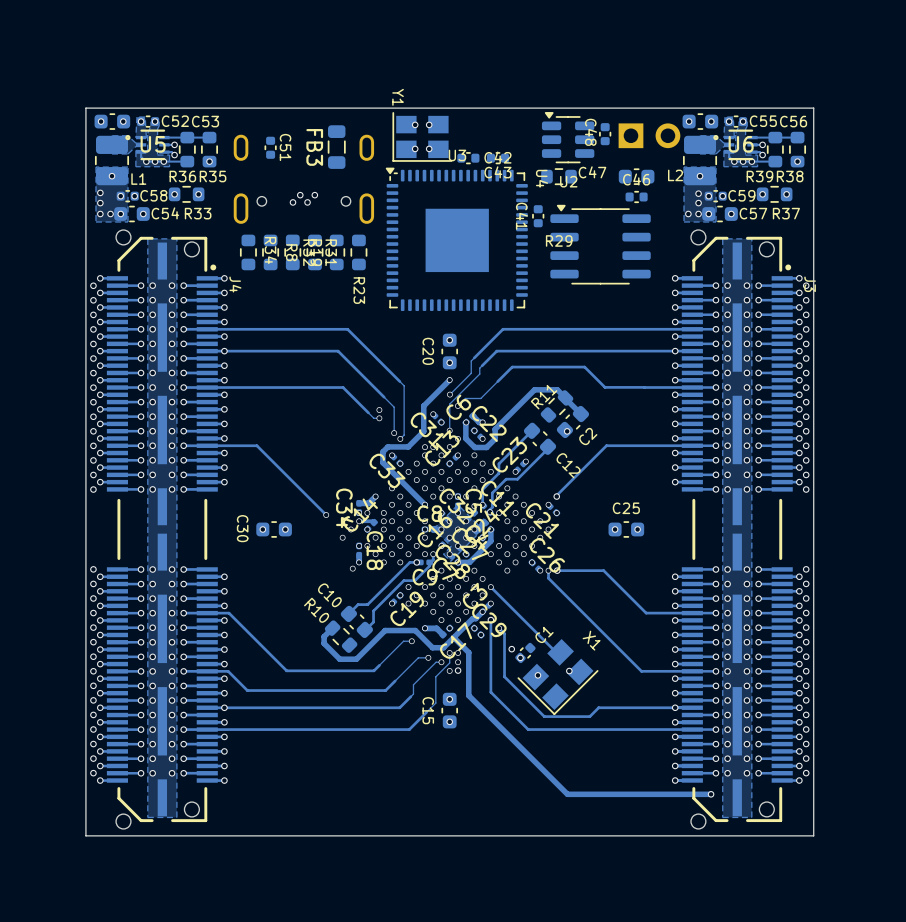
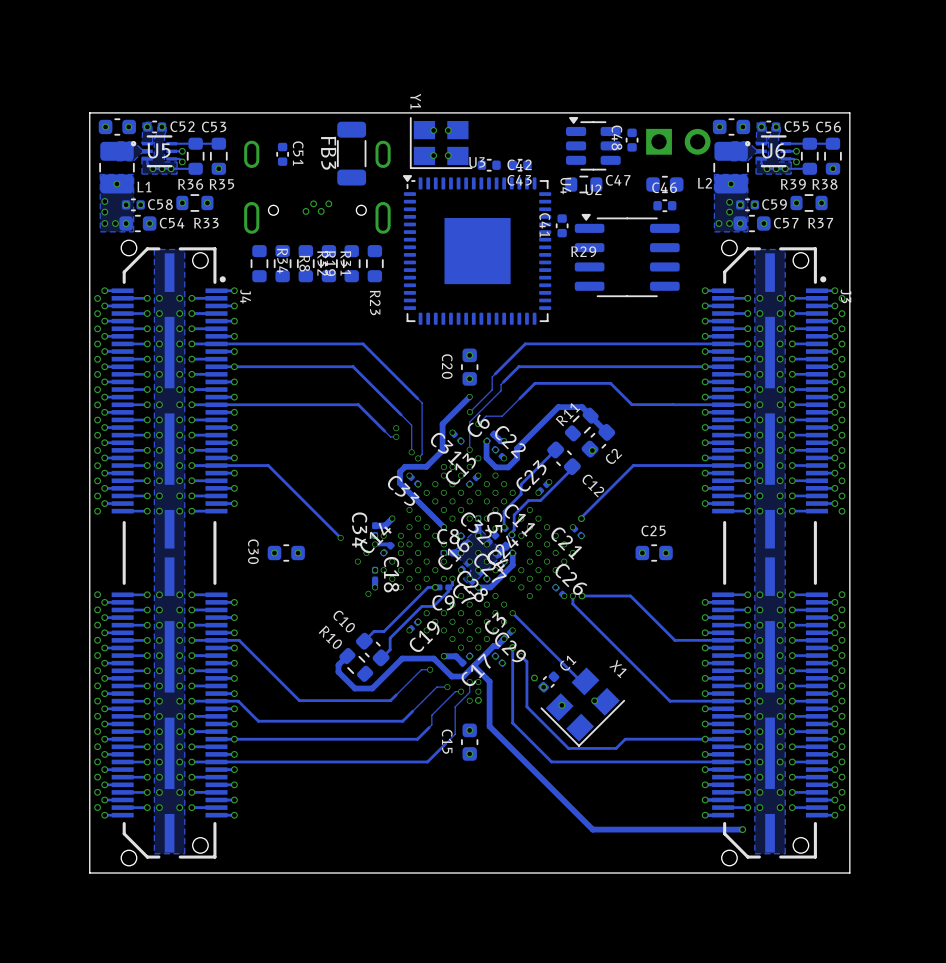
FB3 footprint: [327, 125, 346, 169] -> [336, 121, 367, 186]

